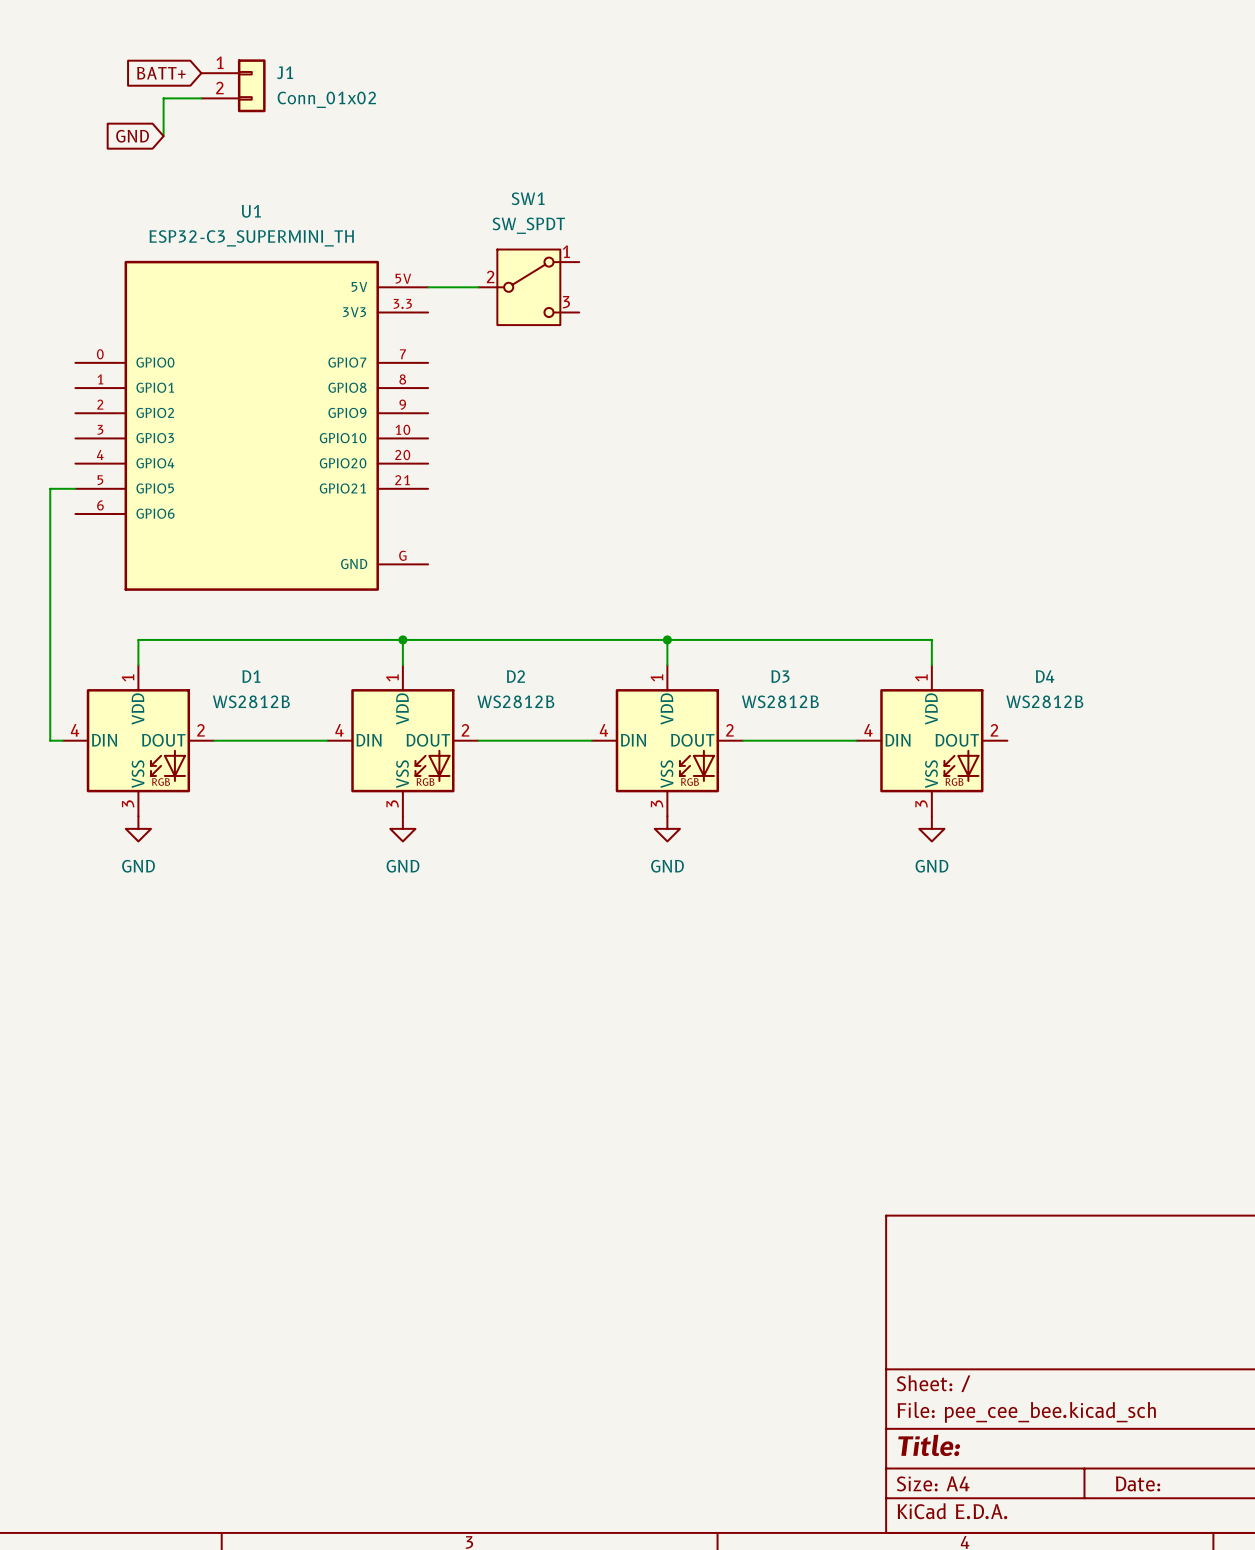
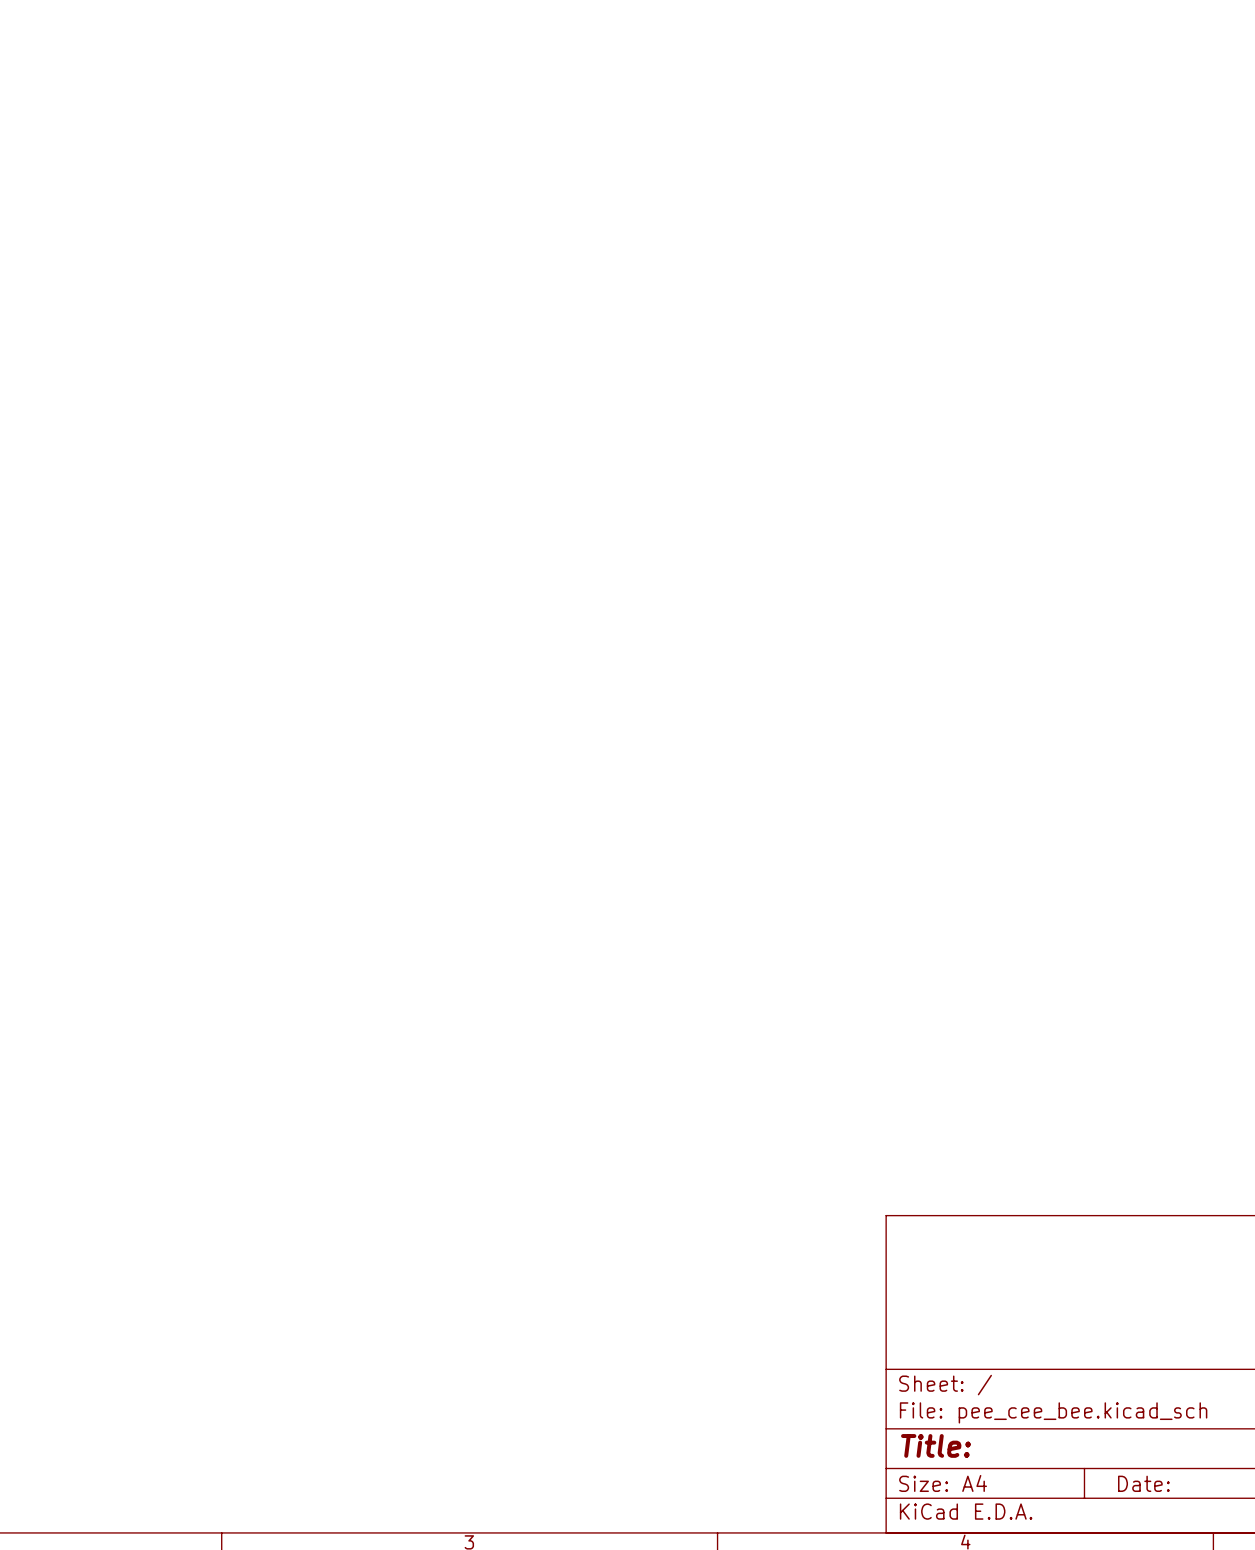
global label: BATT+ (161, 73) -> none
J1: Conn_01x02 (233, 85) -> none
wire: (201, 98) (163, 98) (163, 136) -> none
global label: GND (132, 136) -> none
wire: (428, 287) (478, 287) -> none
SW1: SW_SPDT (528, 287) -> none
U1: ESP32-C3_SUPERMINI_TH (251, 425) -> none
wire: (75, 488) (50, 488) (50, 740) (62, 740) -> none
wire: (402, 639) (402, 665) -> none
junction: (402, 639) -> none
wire: (667, 639) (667, 665) -> none
junction: (667, 639) -> none
wire: (138, 665) (138, 639) (931, 639) (931, 665) -> none
D1: WS2812B (138, 740) -> none
wire: (213, 740) (327, 740) -> none
D2: WS2812B (402, 740) -> none
wire: (478, 740) (591, 740) -> none
D3: WS2812B (667, 740) -> none
wire: (742, 740) (856, 740) -> none
D4: WS2812B (931, 740) -> none
power symbol: GND (138, 828) -> none
power symbol: GND (402, 828) -> none
power symbol: GND (667, 828) -> none
power symbol: GND (931, 828) -> none

